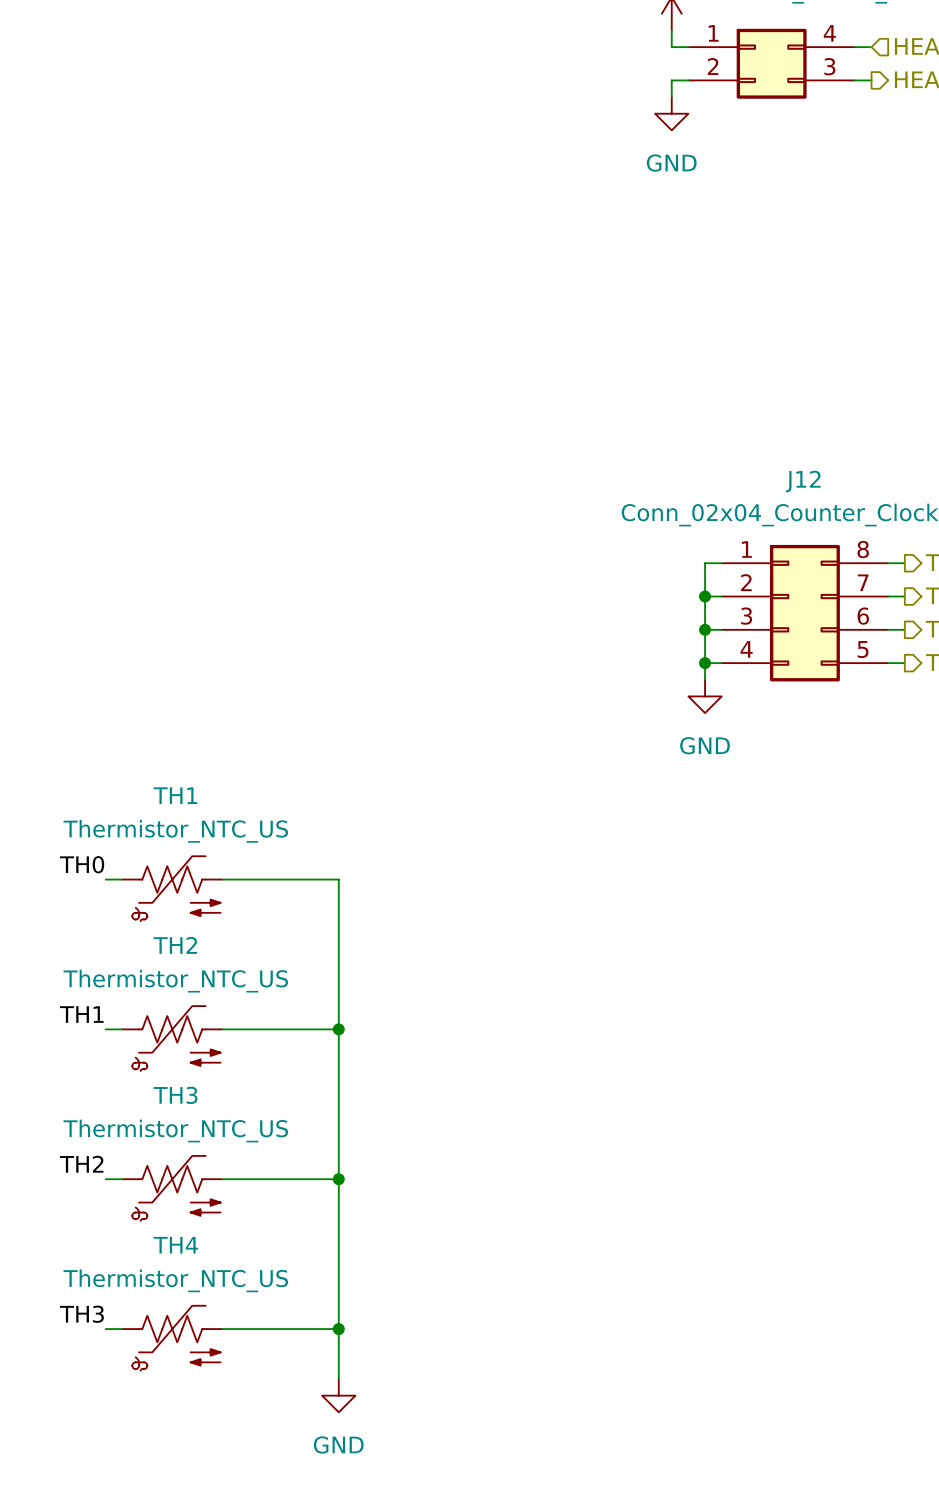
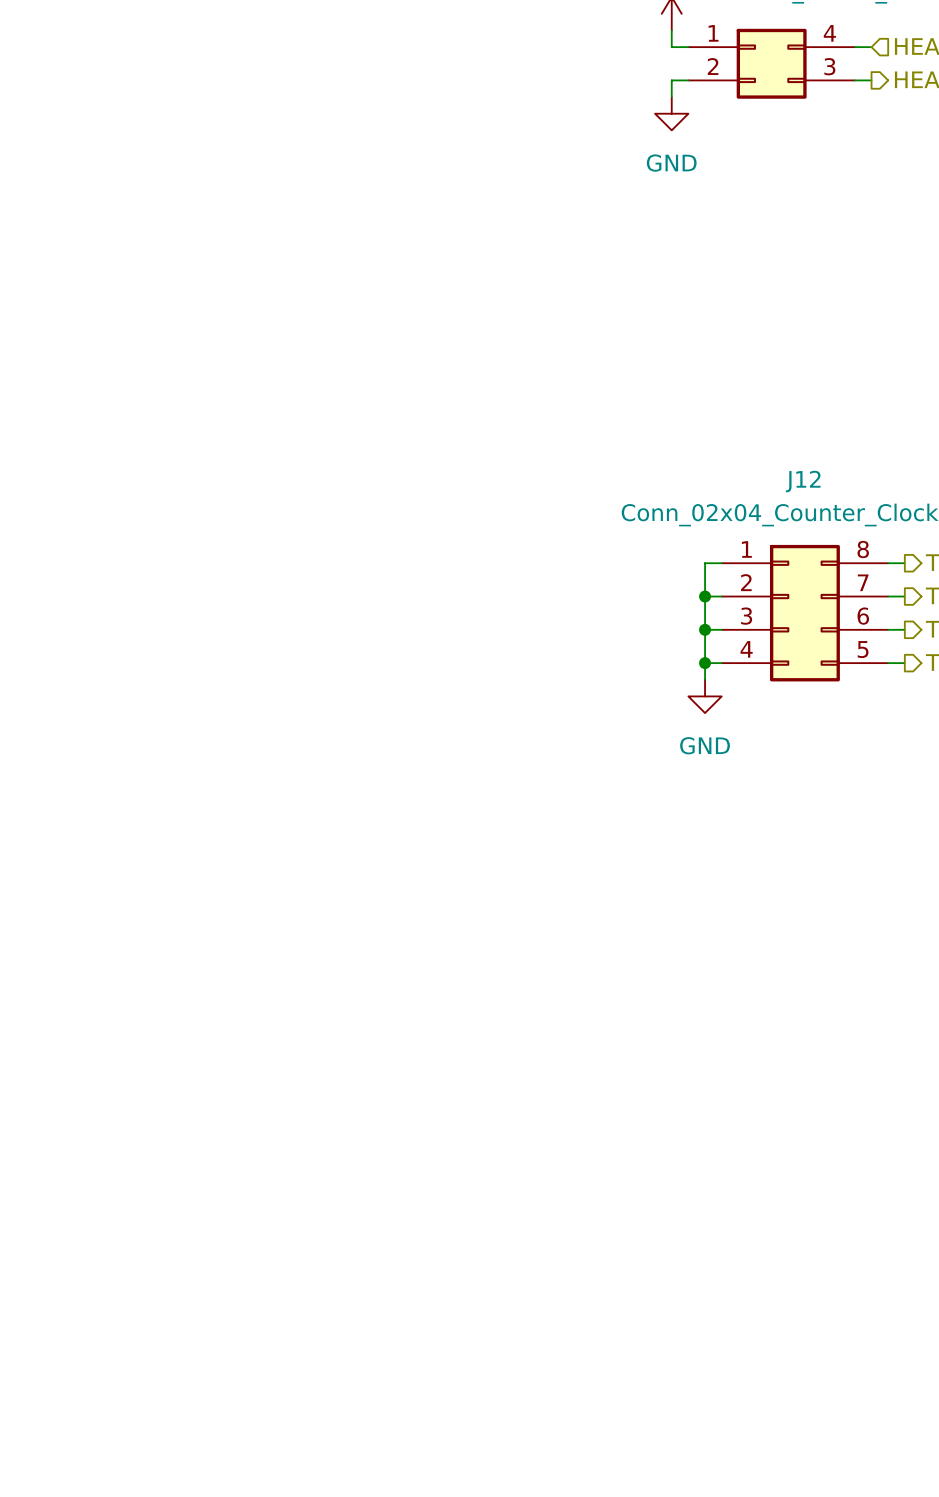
label: TH0 (82, 864) -> none
wire: (105, 879) (122, 879) -> none
wire: (222, 879) (338, 879) (338, 1379) -> none
TH1: Thermistor_NTC_US (172, 888) -> none
label: TH1 (81, 1014) -> none
wire: (105, 1029) (122, 1029) -> none
wire: (222, 1029) (338, 1029) -> none
junction: (338, 1029) -> none
TH2: Thermistor_NTC_US (172, 1038) -> none
label: TH2 (81, 1164) -> none
wire: (105, 1179) (122, 1179) -> none
wire: (222, 1179) (338, 1179) -> none
junction: (338, 1179) -> none
TH3: Thermistor_NTC_US (172, 1188) -> none
label: TH3 (81, 1314) -> none
wire: (105, 1329) (122, 1329) -> none
wire: (222, 1329) (338, 1329) -> none
junction: (338, 1329) -> none
TH4: Thermistor_NTC_US (172, 1338) -> none
power symbol: GND (338, 1395) -> none

